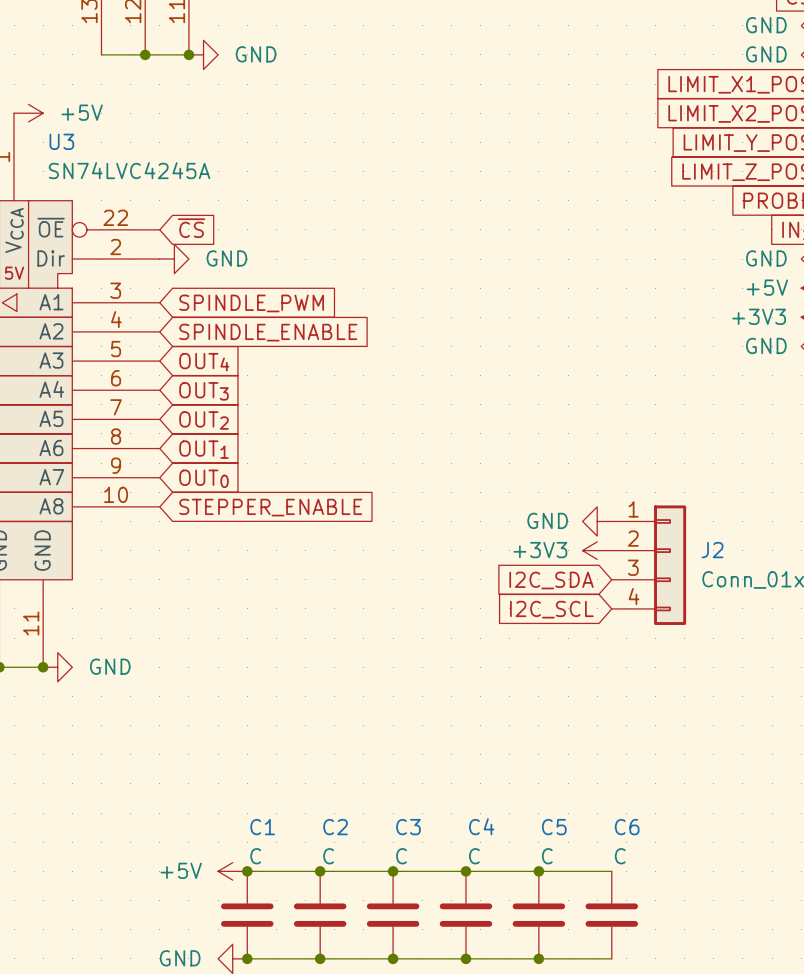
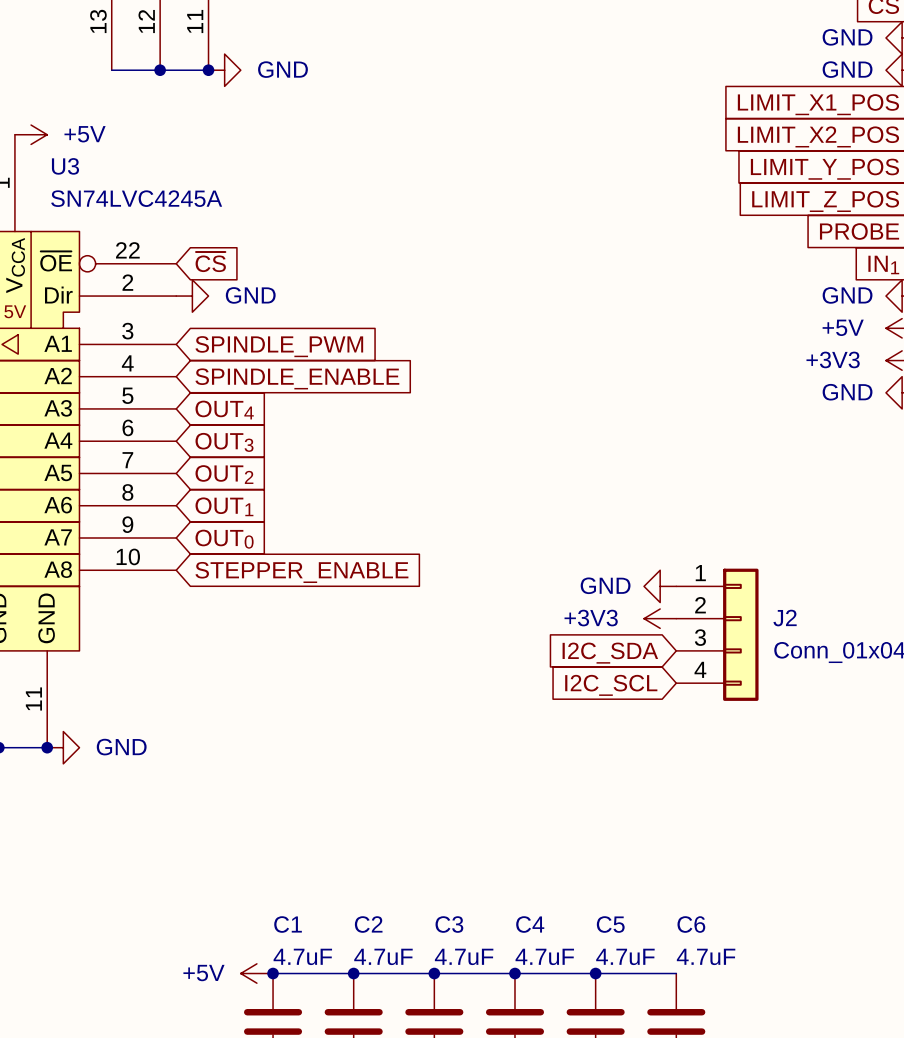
C1 value: C (255, 856) -> 4.7uF (302, 956)
C2 value: C (328, 856) -> 4.7uF (383, 956)
C3 value: C (401, 856) -> 4.7uF (464, 956)
C4 value: C (474, 856) -> 4.7uF (544, 956)
C5 value: C (547, 856) -> 4.7uF (625, 956)
C6 value: C (620, 856) -> 4.7uF (706, 956)

